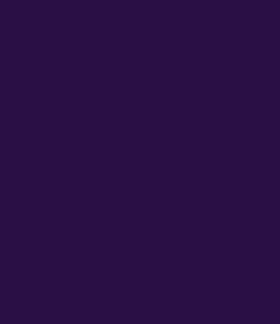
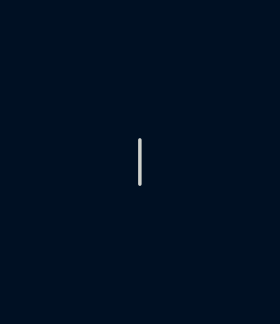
board edge: none -> (139, 139) (139, 184)

